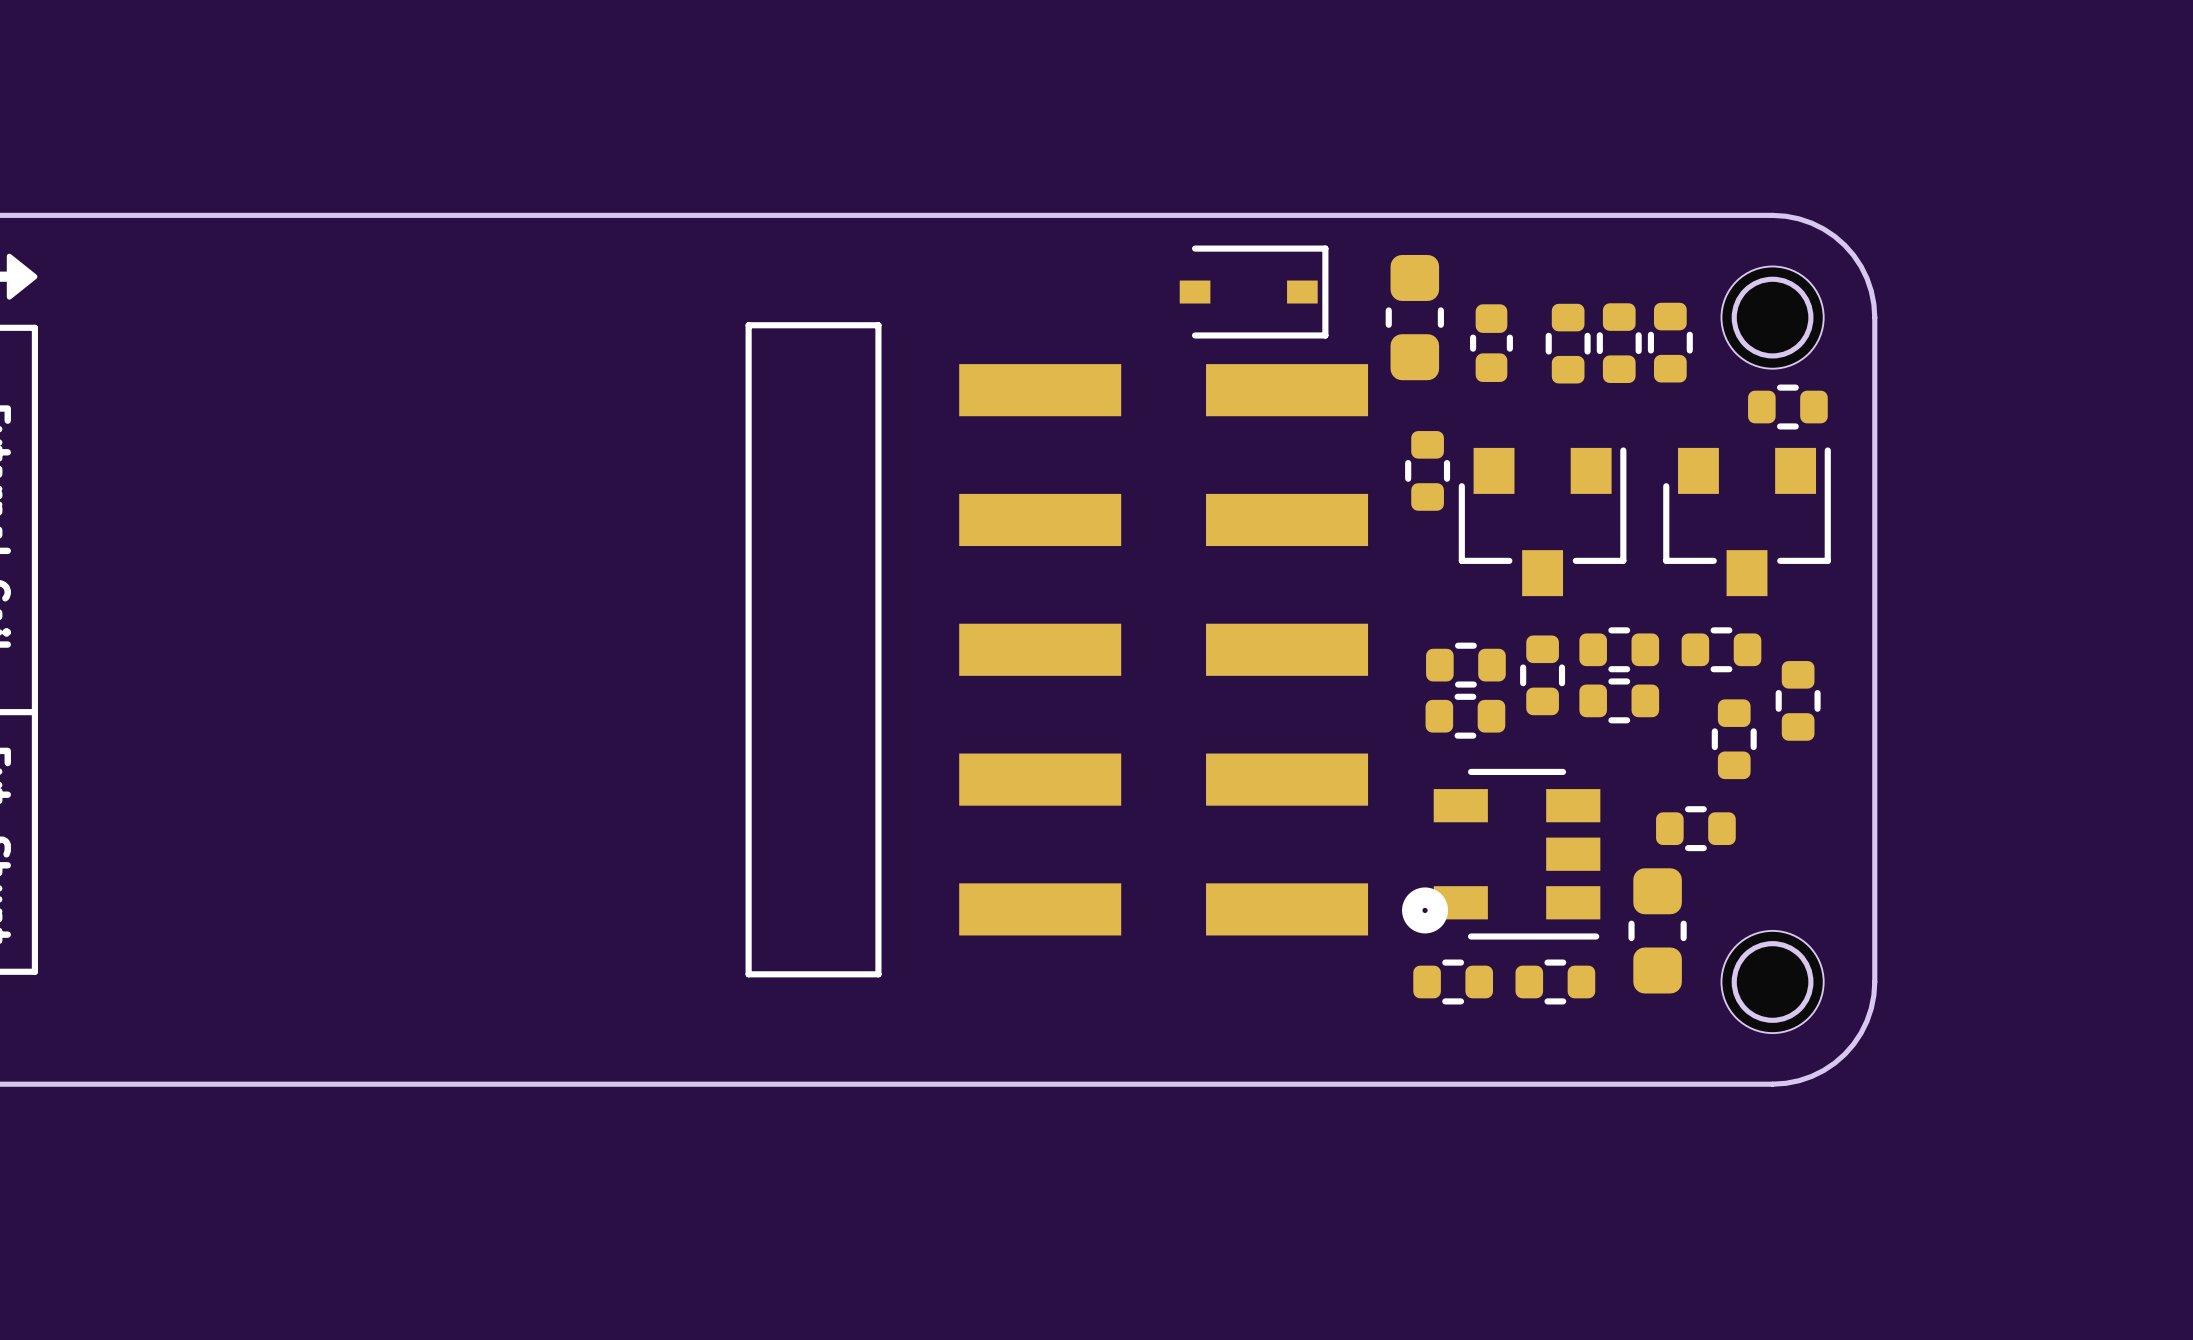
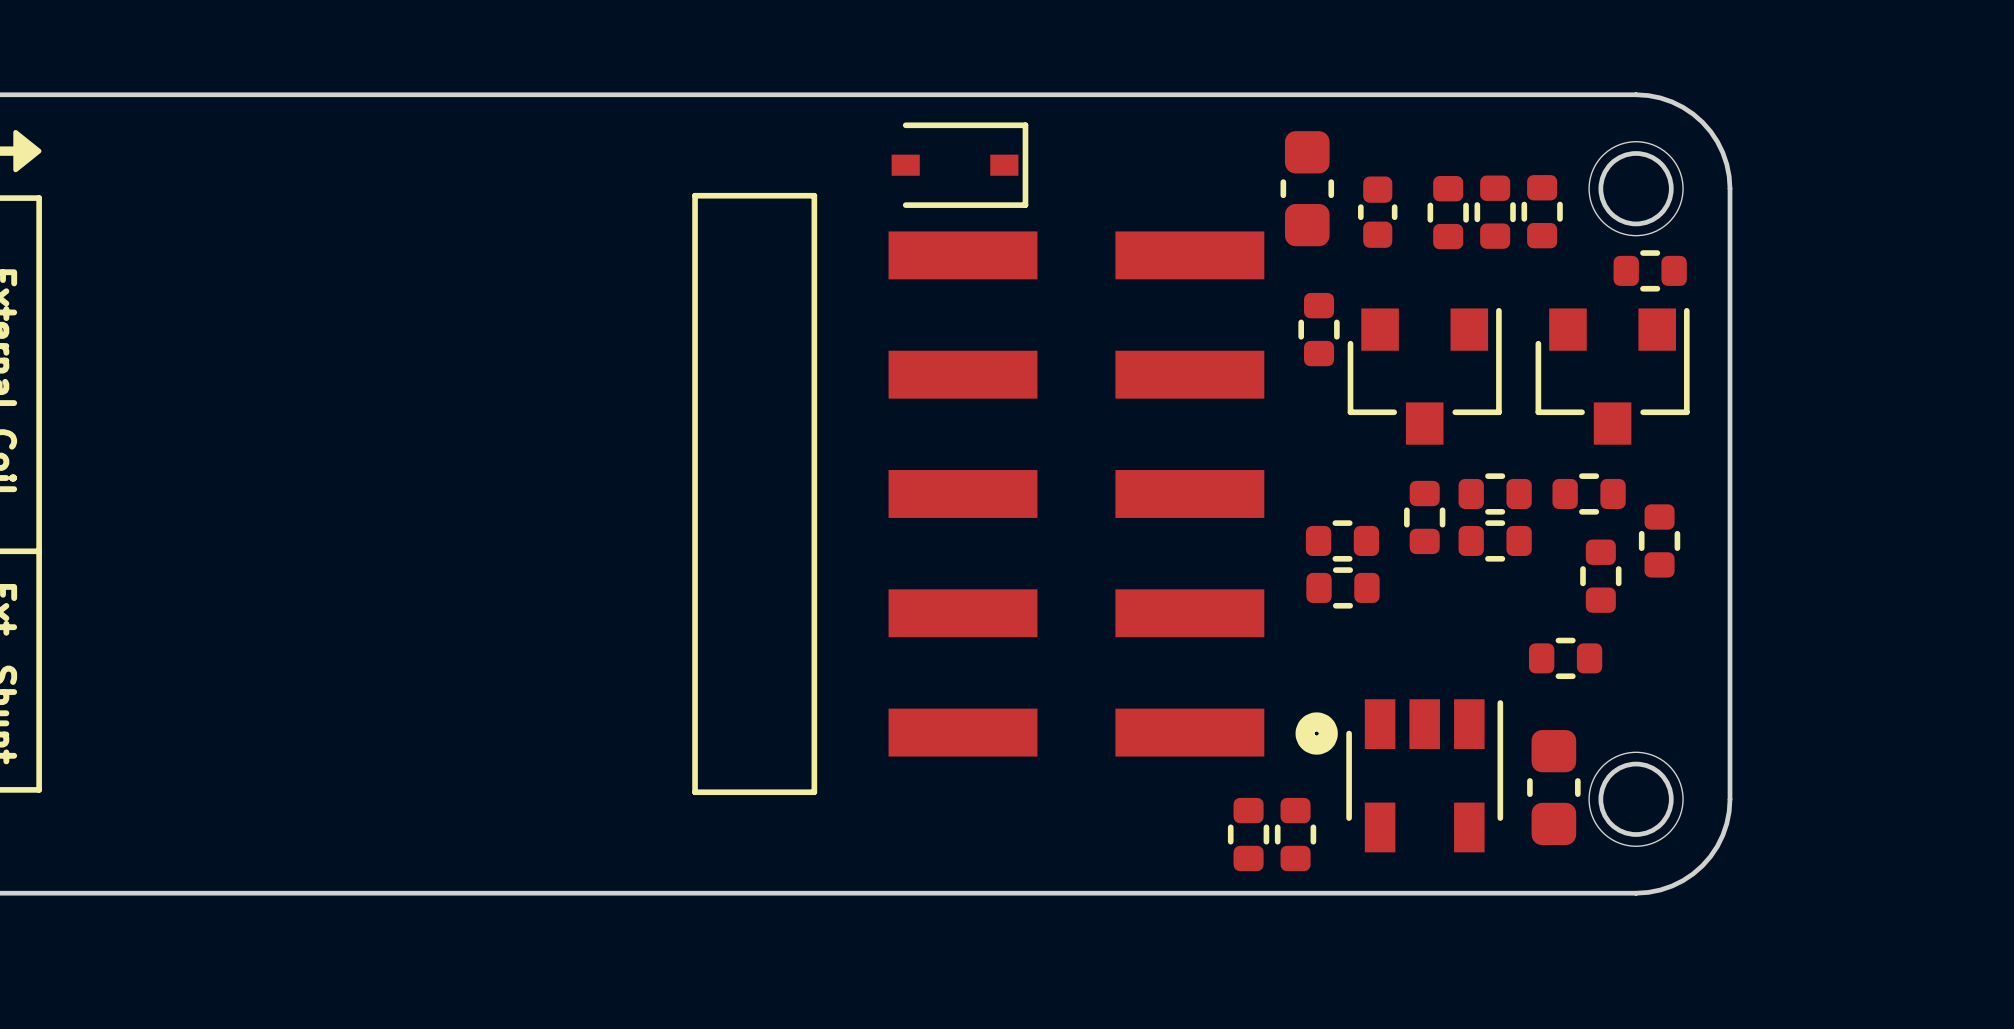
part position: (1254, 292) -> (959, 165)
part: (1465, 665) -> none
part: none -> (1342, 540)
part: (1465, 716) -> none
part: none -> (1342, 587)
part: (1517, 854) -> none
part position: (1657, 930) -> (1553, 787)
part footprint: [1515, 959, 1596, 1005] -> [1346, 699, 1504, 853]
part: (1453, 981) -> none
part: none -> (1248, 834)
part: none -> (1295, 834)

